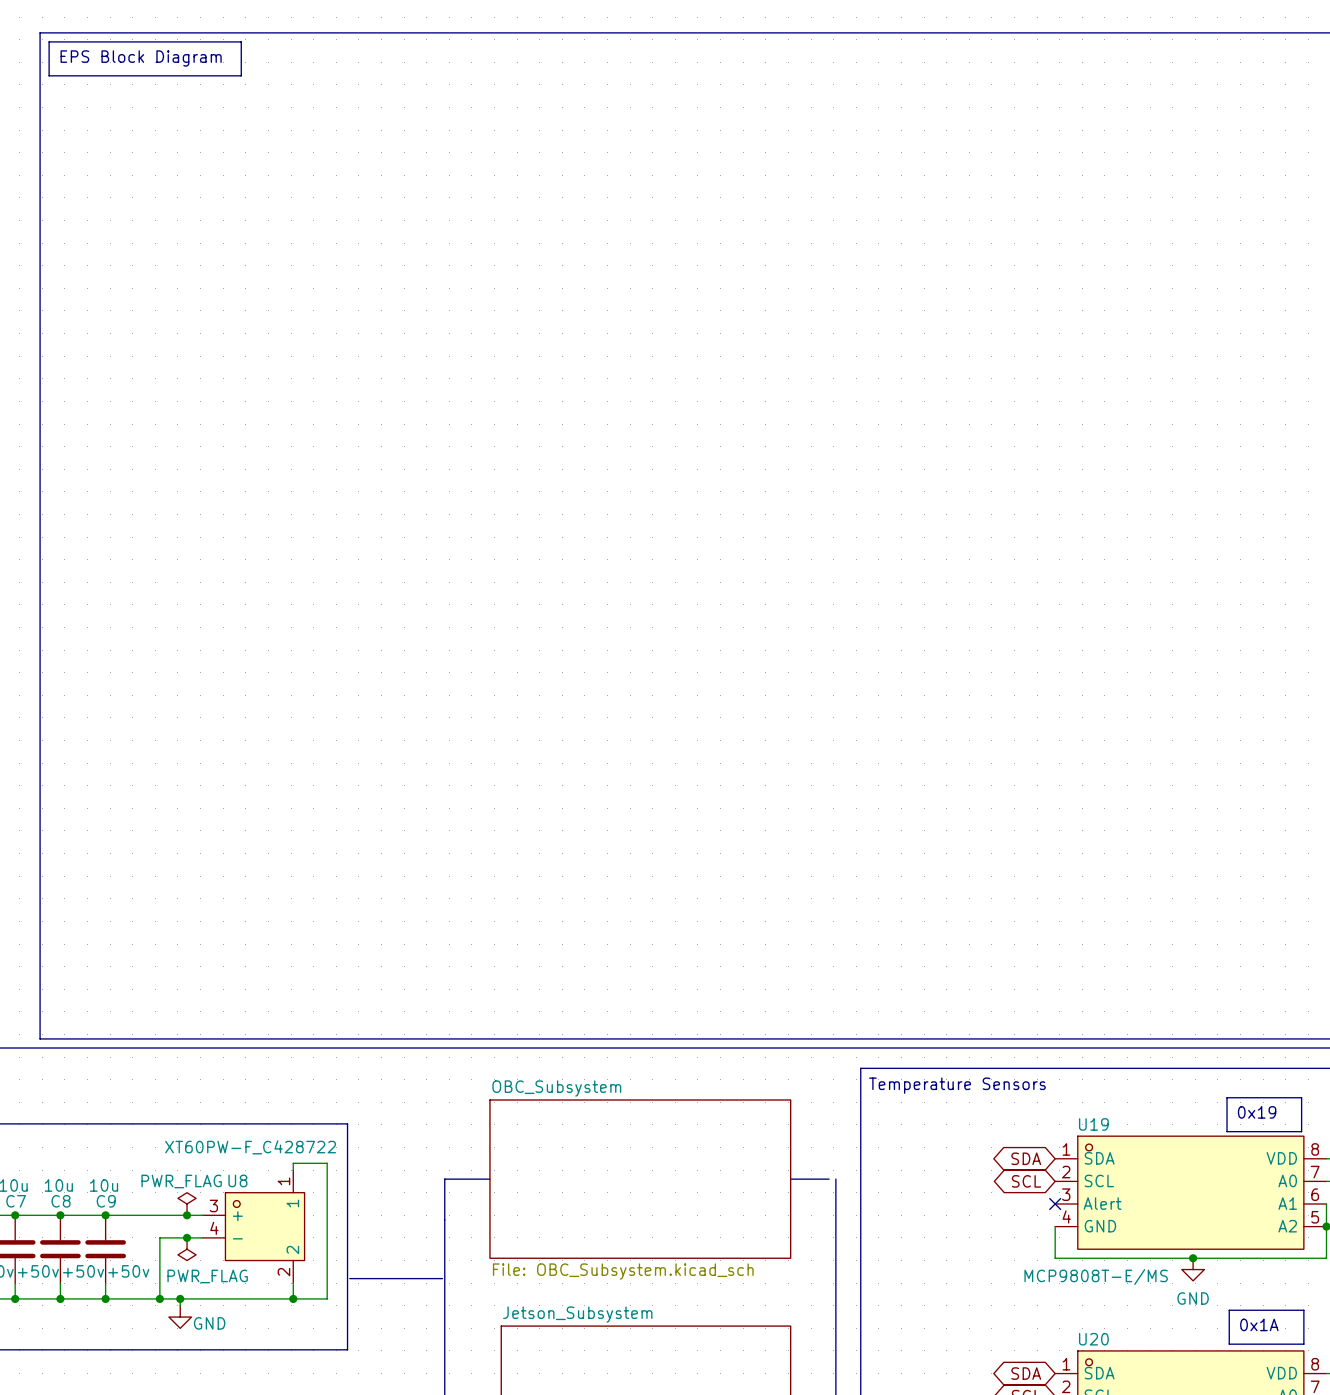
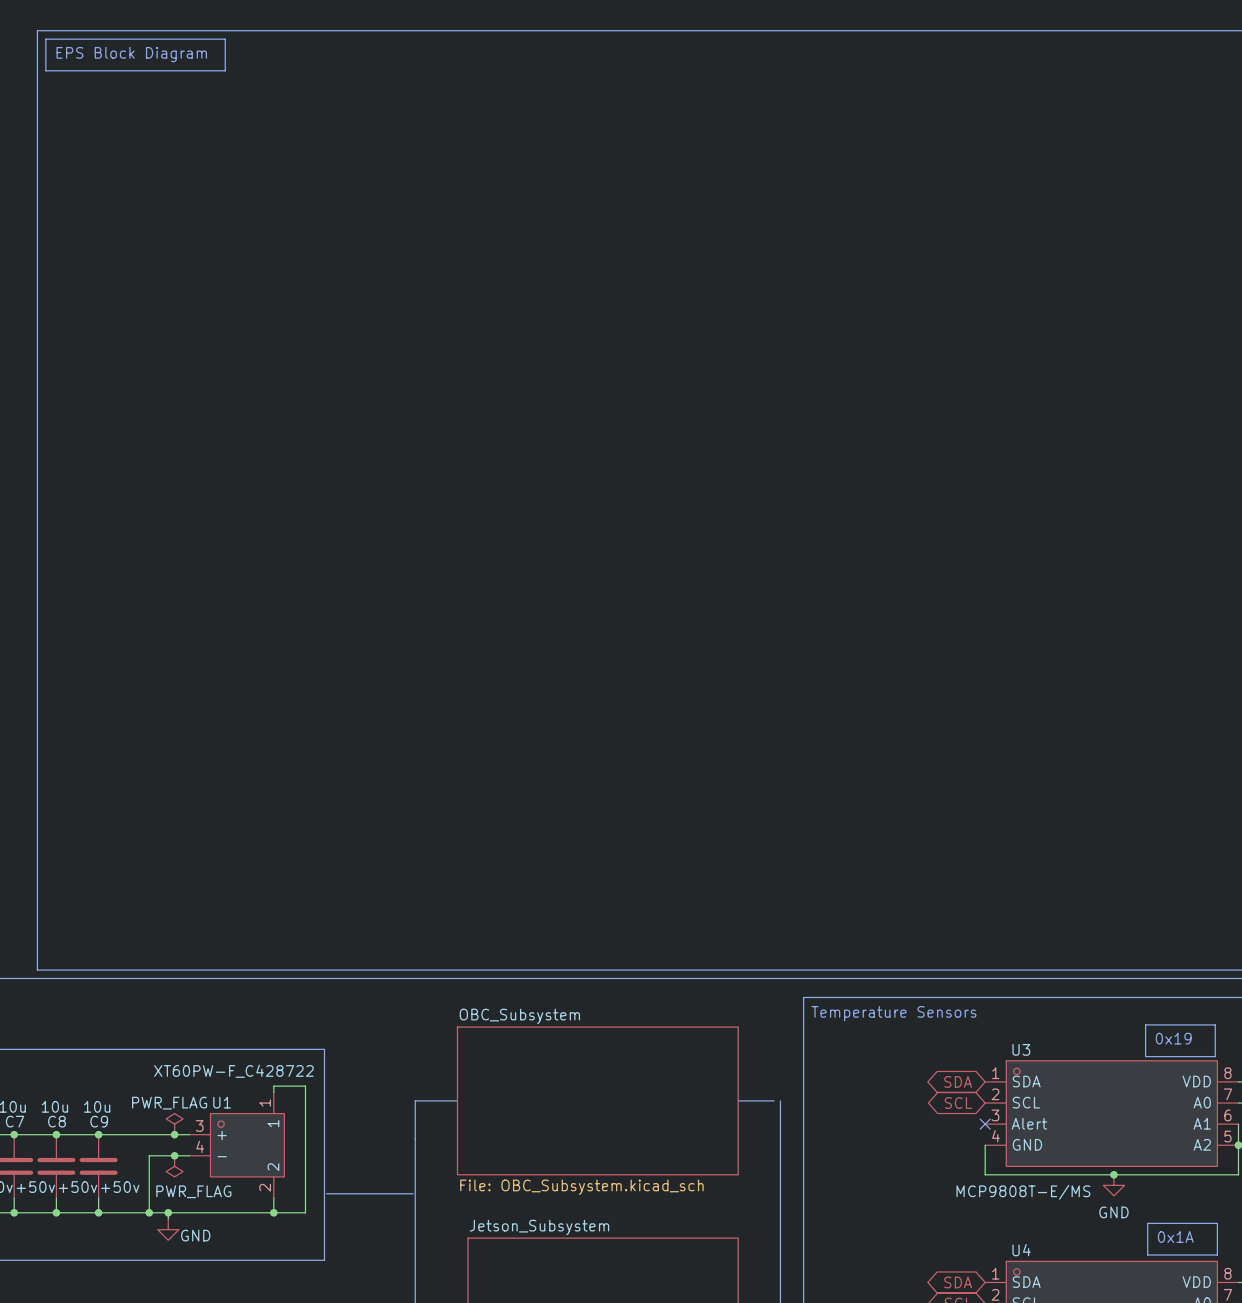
U19 name: U19 (1093, 1124) -> U3 (1021, 1049)
U8 name: U8 (237, 1180) -> U1 (222, 1102)
U20 name: U20 (1093, 1339) -> U4 (1021, 1250)

